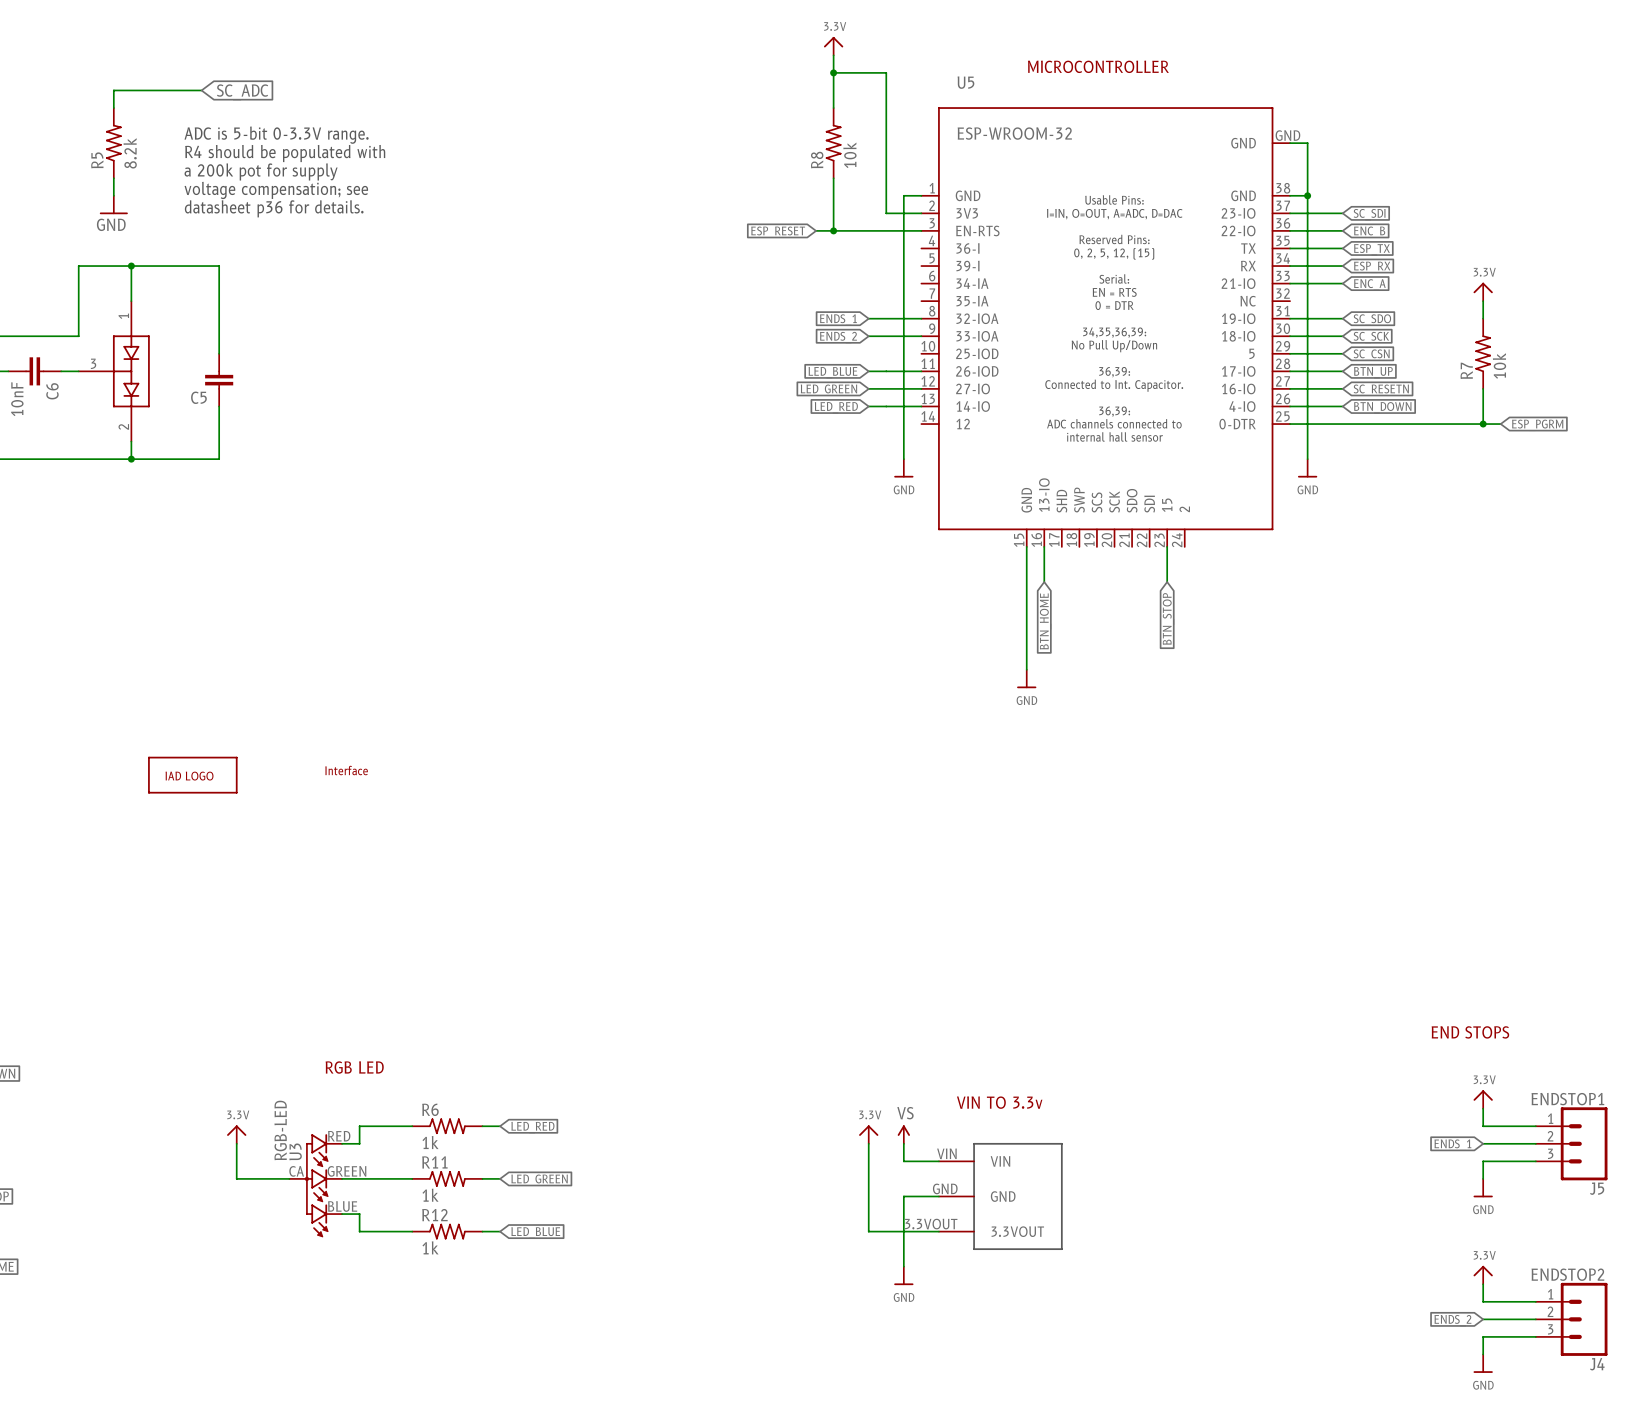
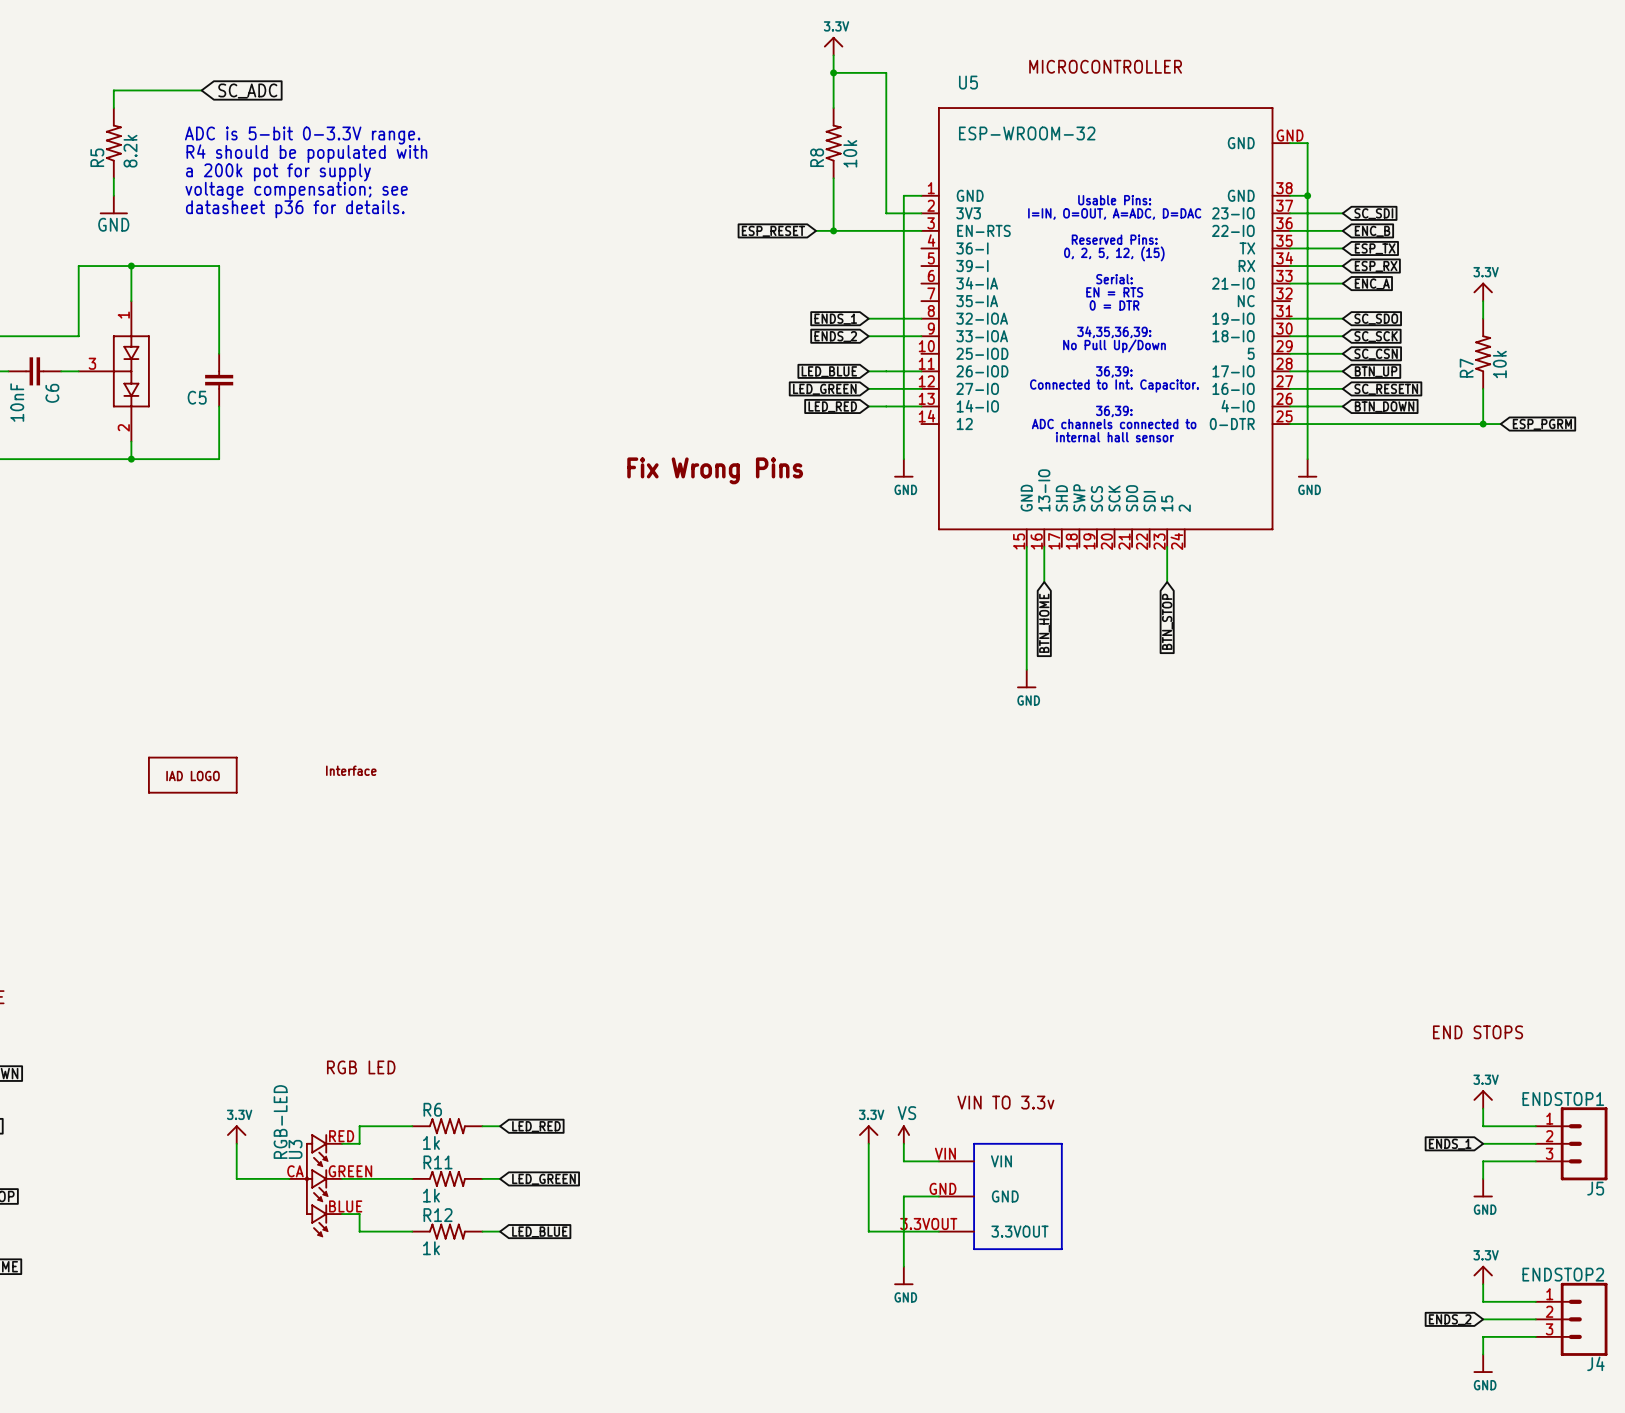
text: none -> Fix Wrong Pins (715, 470)

